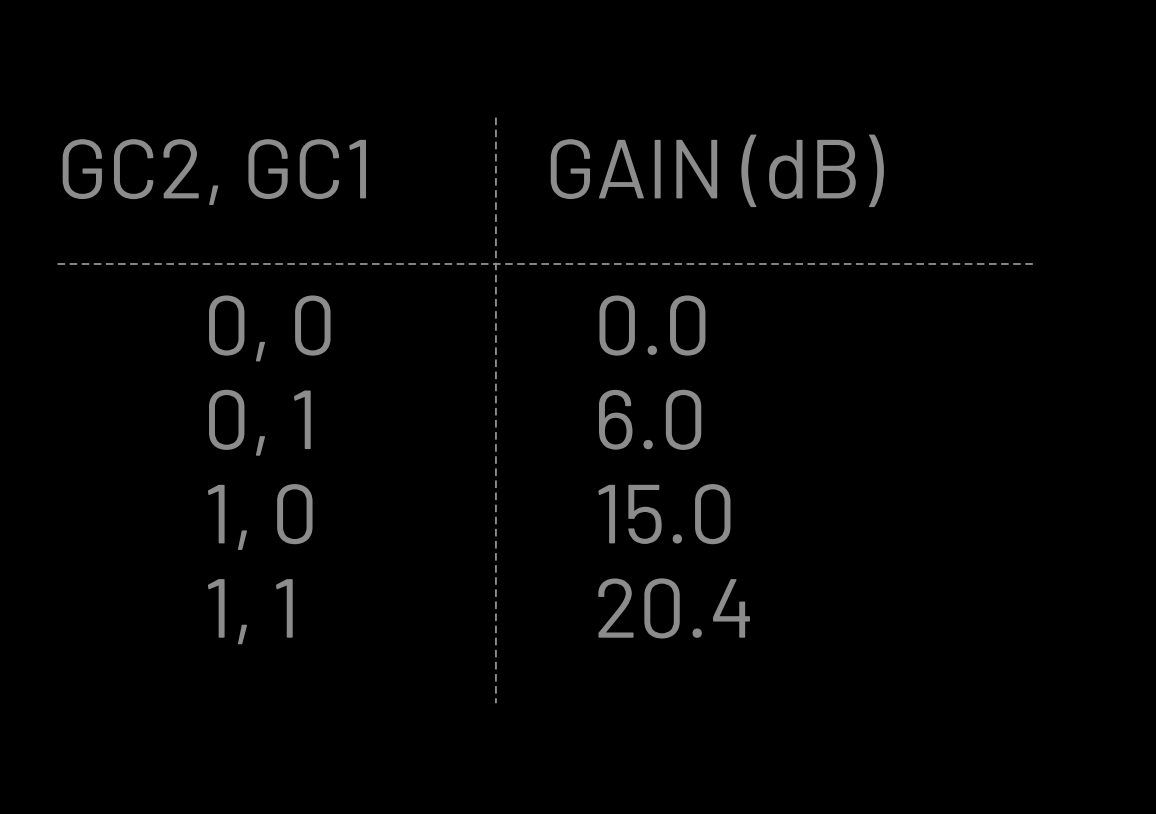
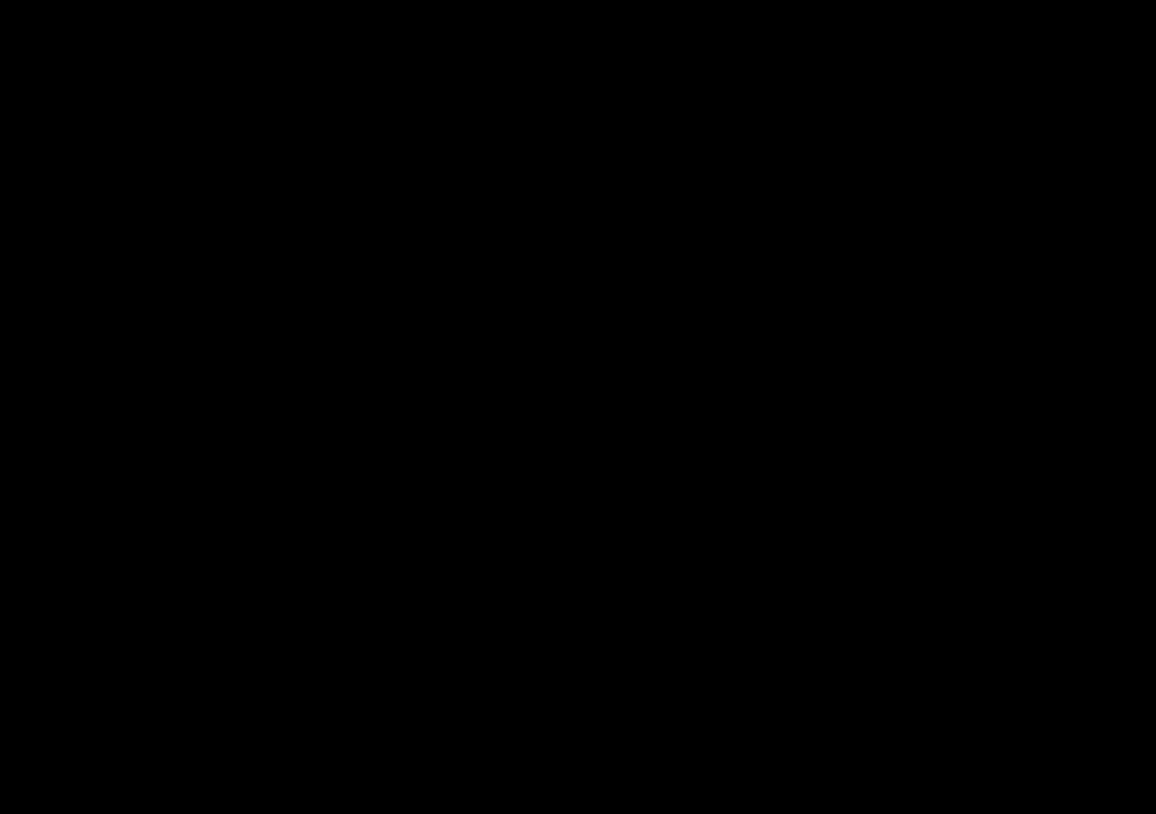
line: (495, 117) (495, 703) -> none
text: GAIN (dB) (717, 170) -> none
text: GC2, GC1 (214, 172) -> none
line: (56, 263) (1032, 263) -> none
text: 0.0 (652, 325) -> none
text: 0, 0 (269, 328) -> none
text: 6.0 (650, 419) -> none
text: 0, 1 (259, 422) -> none
text: 15.0 (664, 514) -> none
text: 1, 0 (260, 517) -> none
text: 20.4 (674, 608) -> none
text: 1, 1 (250, 611) -> none

